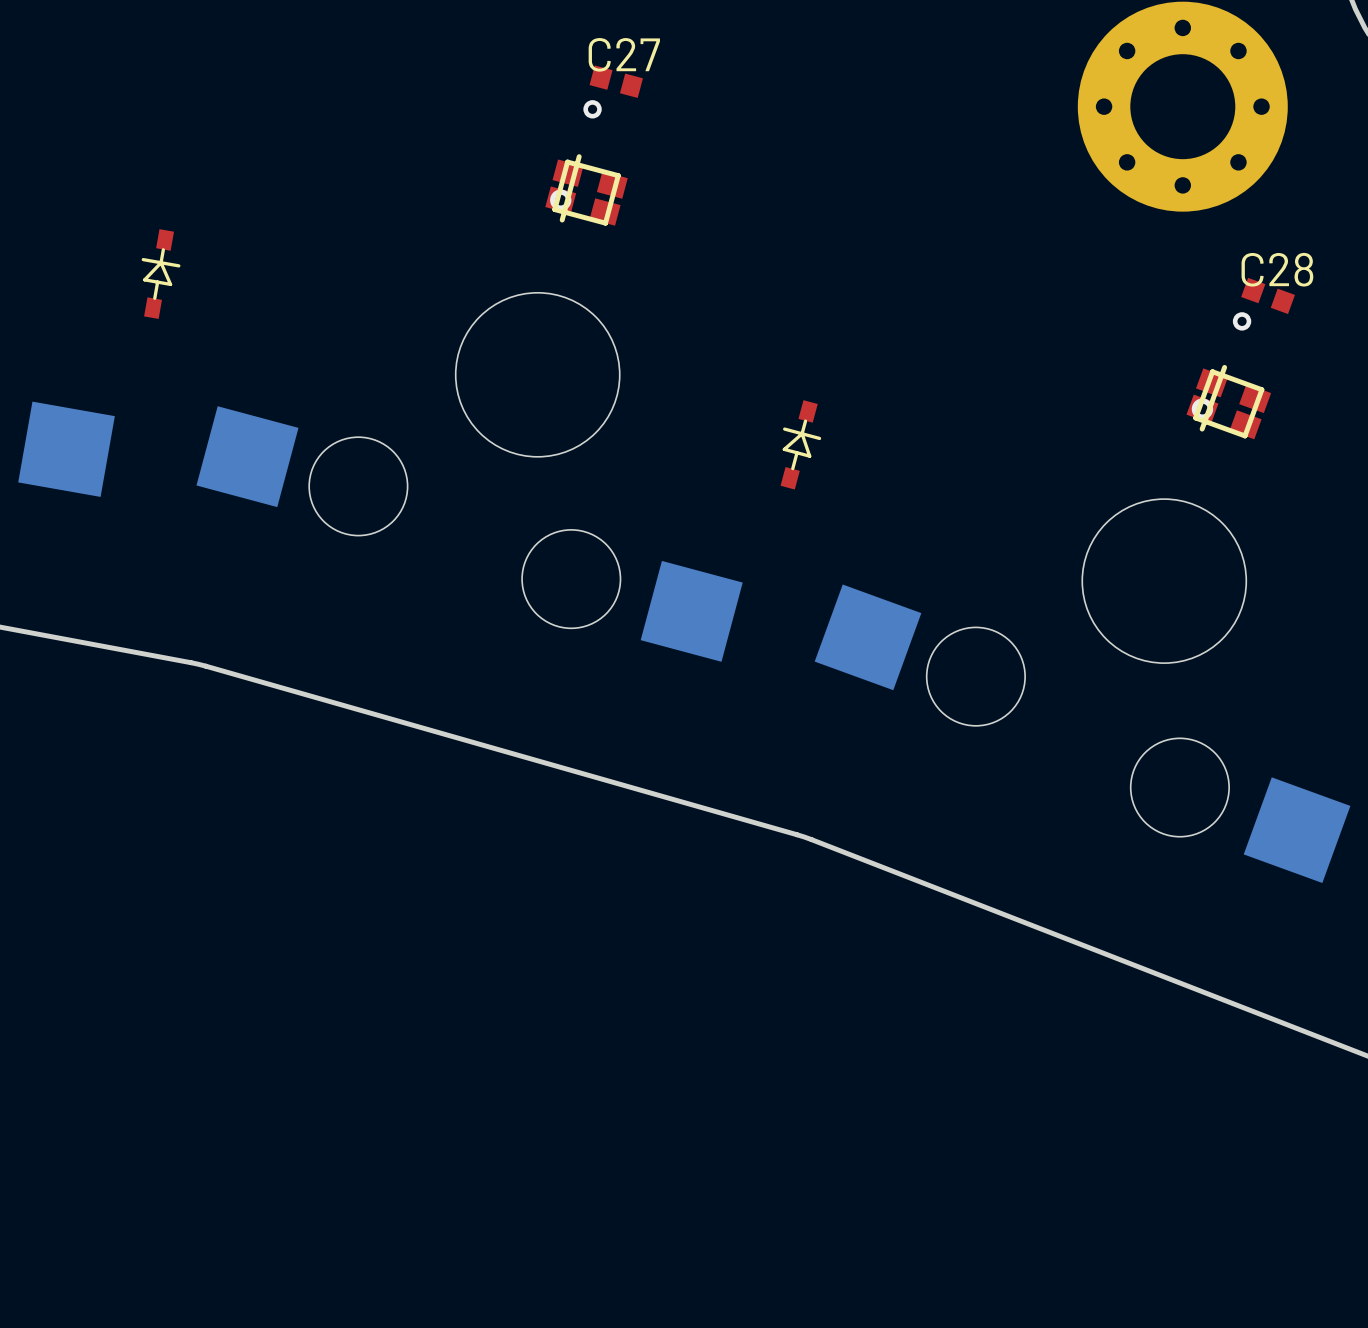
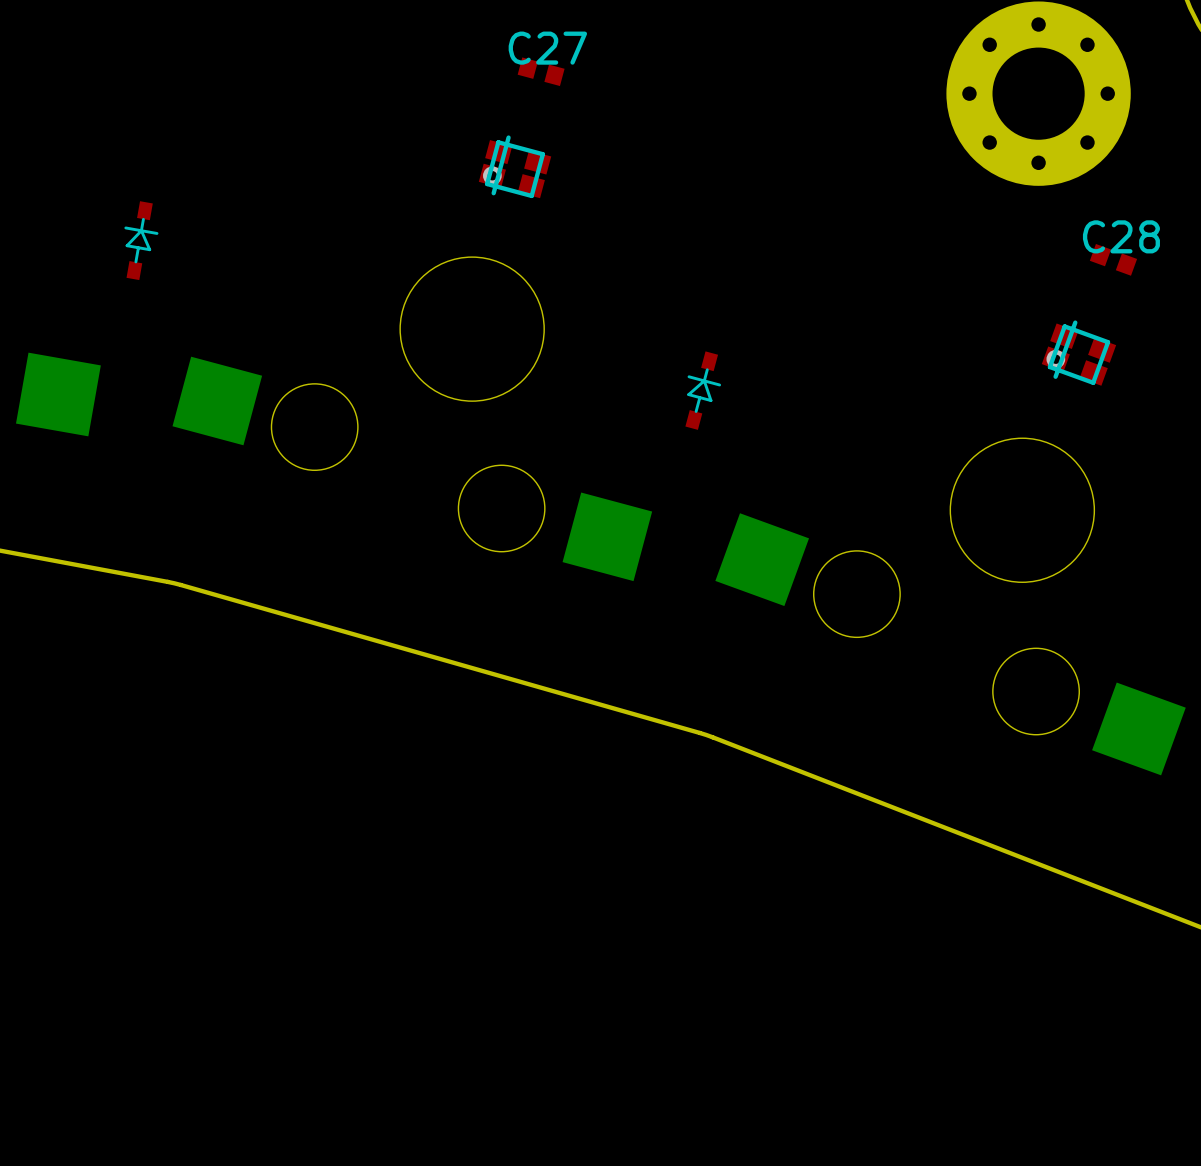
via: (592, 109) -> none
via: (1242, 321) -> none

